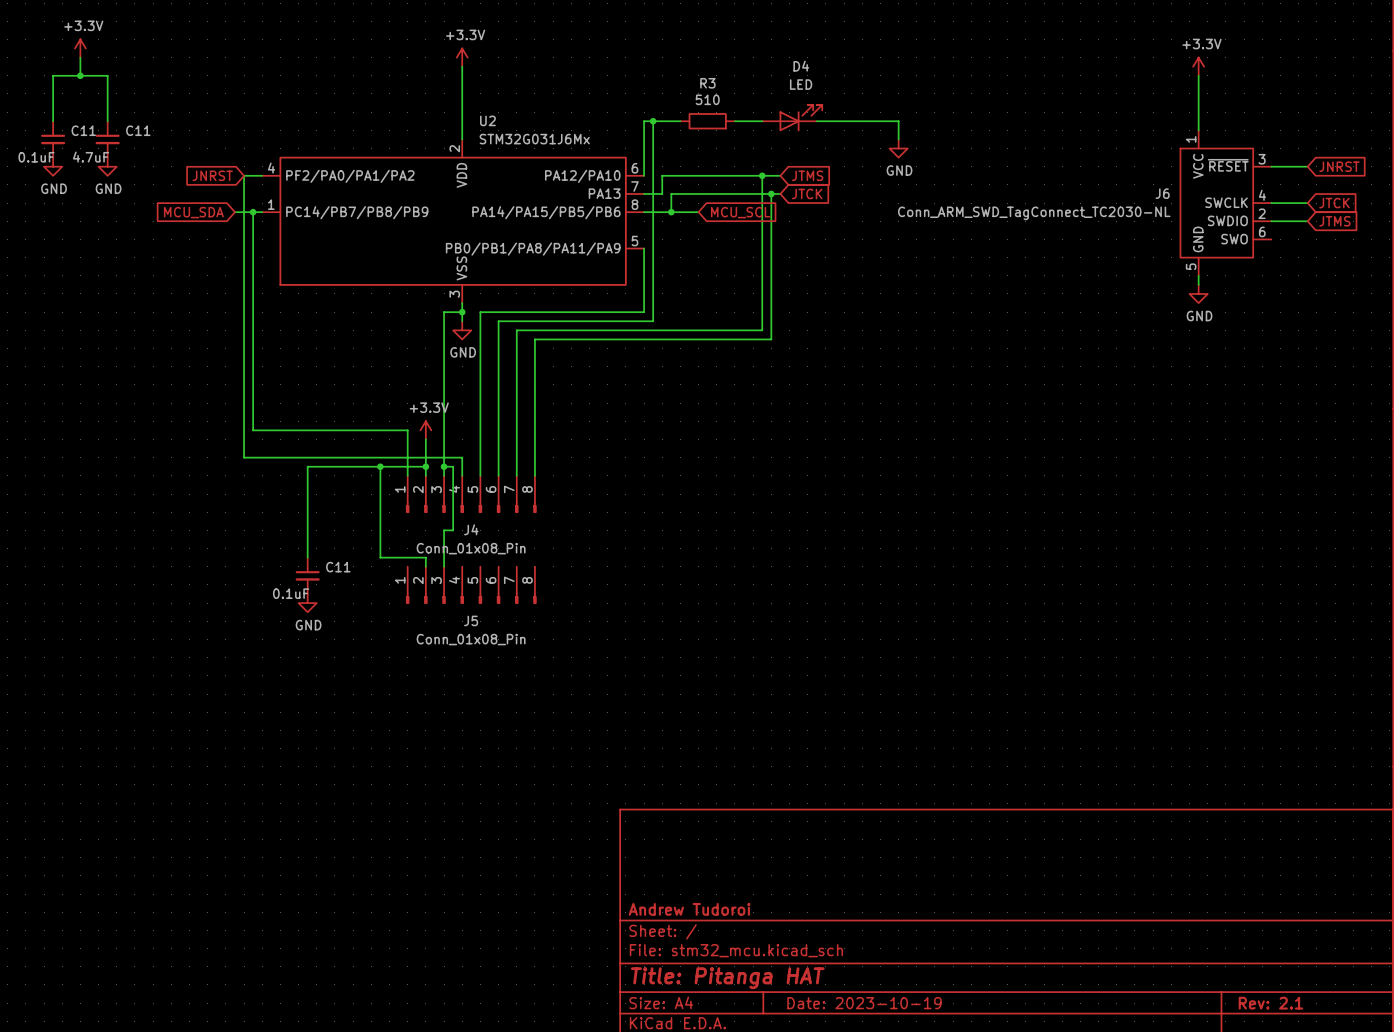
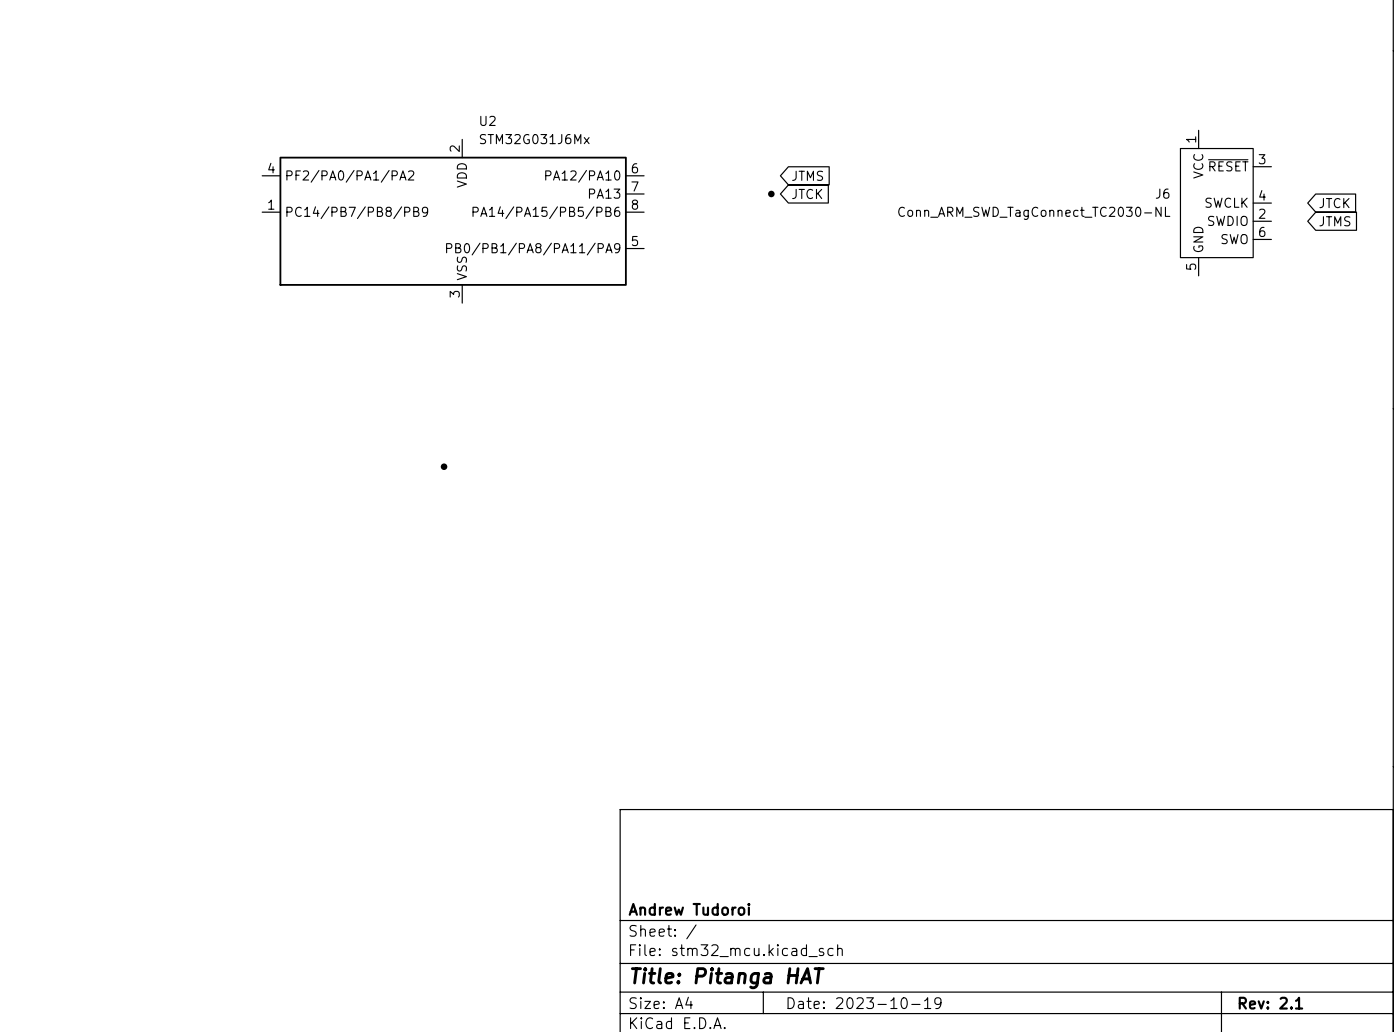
power symbol: +3.3V (80, 48) -> none
wire: (80, 57) (80, 75) -> none
power symbol: +3.3V (462, 57) -> none
wire: (462, 66) (462, 139) -> none
power symbol: +3.3V (1198, 66) -> none
junction: (80, 75) -> none
wire: (1198, 75) (1198, 130) -> none
D4: LED (792, 118) -> none
wire: (53, 121) (53, 75) (107, 75) (107, 121) -> none
wire: (653, 121) (653, 321) (498, 321) (498, 475) -> none
junction: (653, 121) -> none
wire: (680, 121) (644, 121) (644, 175) -> none
R3: 510 (707, 121) -> none
wire: (734, 121) (762, 121) -> none
wire: (816, 121) (898, 121) (898, 139) -> none
C11: 0.1uF (53, 139) -> none
C11: 4.7uF (107, 139) -> none
power symbol: GND (898, 148) -> none
power symbol: GND (53, 166) -> none
power symbol: GND (107, 166) -> none
wire: (1271, 166) (1307, 166) -> none
global label: JNRST (1339, 166) -> none
global label: JNRST (212, 175) -> none
wire: (262, 175) (244, 175) (244, 457) (462, 457) (462, 475) -> none
wire: (762, 175) (762, 330) (516, 330) (516, 475) -> none
junction: (762, 175) -> none
wire: (780, 175) (662, 175) (662, 193) (644, 193) -> none
wire: (771, 193) (771, 339) (534, 339) (534, 475) -> none
wire: (780, 193) (671, 193) (671, 212) -> none
wire: (1271, 203) (1307, 203) -> none
global label: MCU_SDA (193, 212) -> none
wire: (234, 212) (262, 212) -> none
wire: (253, 212) (253, 430) (407, 430) (407, 475) -> none
junction: (253, 212) -> none
wire: (644, 212) (698, 212) -> none
junction: (671, 212) -> none
global label: MCU_SCL (740, 212) -> none
wire: (1271, 221) (1307, 221) -> none
wire: (644, 248) (644, 312) (480, 312) (480, 475) -> none
wire: (1198, 275) (1198, 284) -> none
power symbol: GND (1198, 293) -> none
wire: (462, 303) (462, 321) -> none
wire: (462, 312) (444, 312) (444, 475) -> none
junction: (462, 312) -> none
power symbol: GND (462, 330) -> none
power symbol: +3.3V (425, 430) -> none
wire: (425, 439) (425, 475) -> none
wire: (380, 466) (380, 557) (425, 557) (425, 566) -> none
junction: (380, 466) -> none
wire: (425, 466) (307, 466) (307, 557) -> none
junction: (425, 466) -> none
wire: (444, 466) (453, 466) (453, 530) (444, 530) (444, 566) -> none
J4: Conn_01x08_Pin (471, 494) -> none
C11: 0.1uF (307, 575) -> none
J5: Conn_01x08_Pin (471, 585) -> none
power symbol: GND (307, 603) -> none

